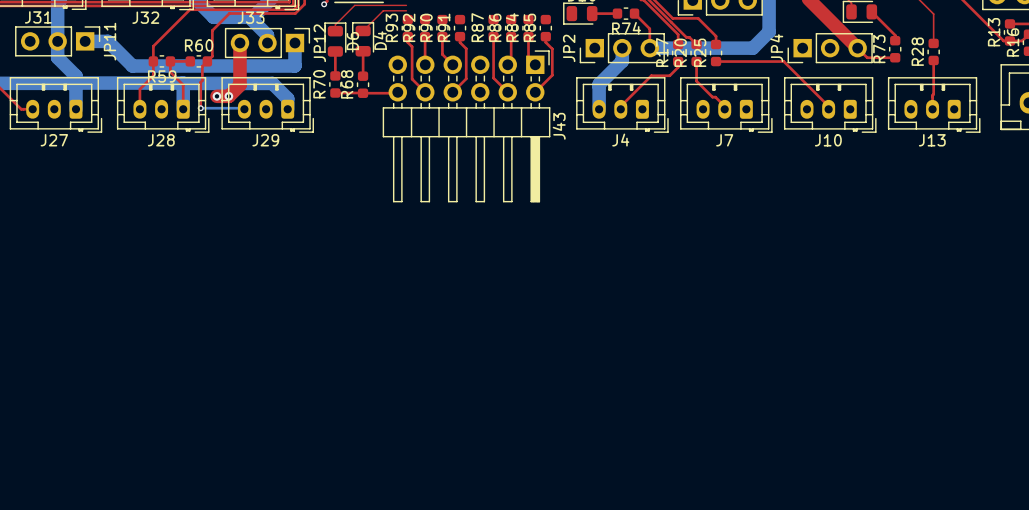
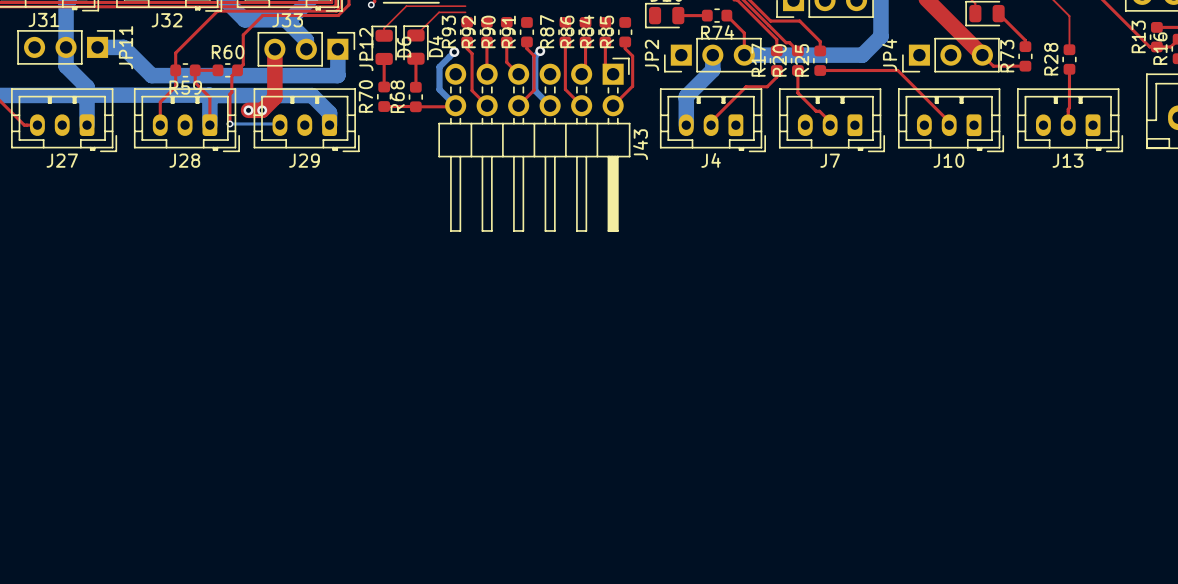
bottom track: none -> (540, 51) (535, 56) (535, 90) (550, 105)
via: none -> (540, 51)
bottom track: none -> (454, 52) (439, 66) (439, 89) (455, 105)
via: none -> (454, 52)

